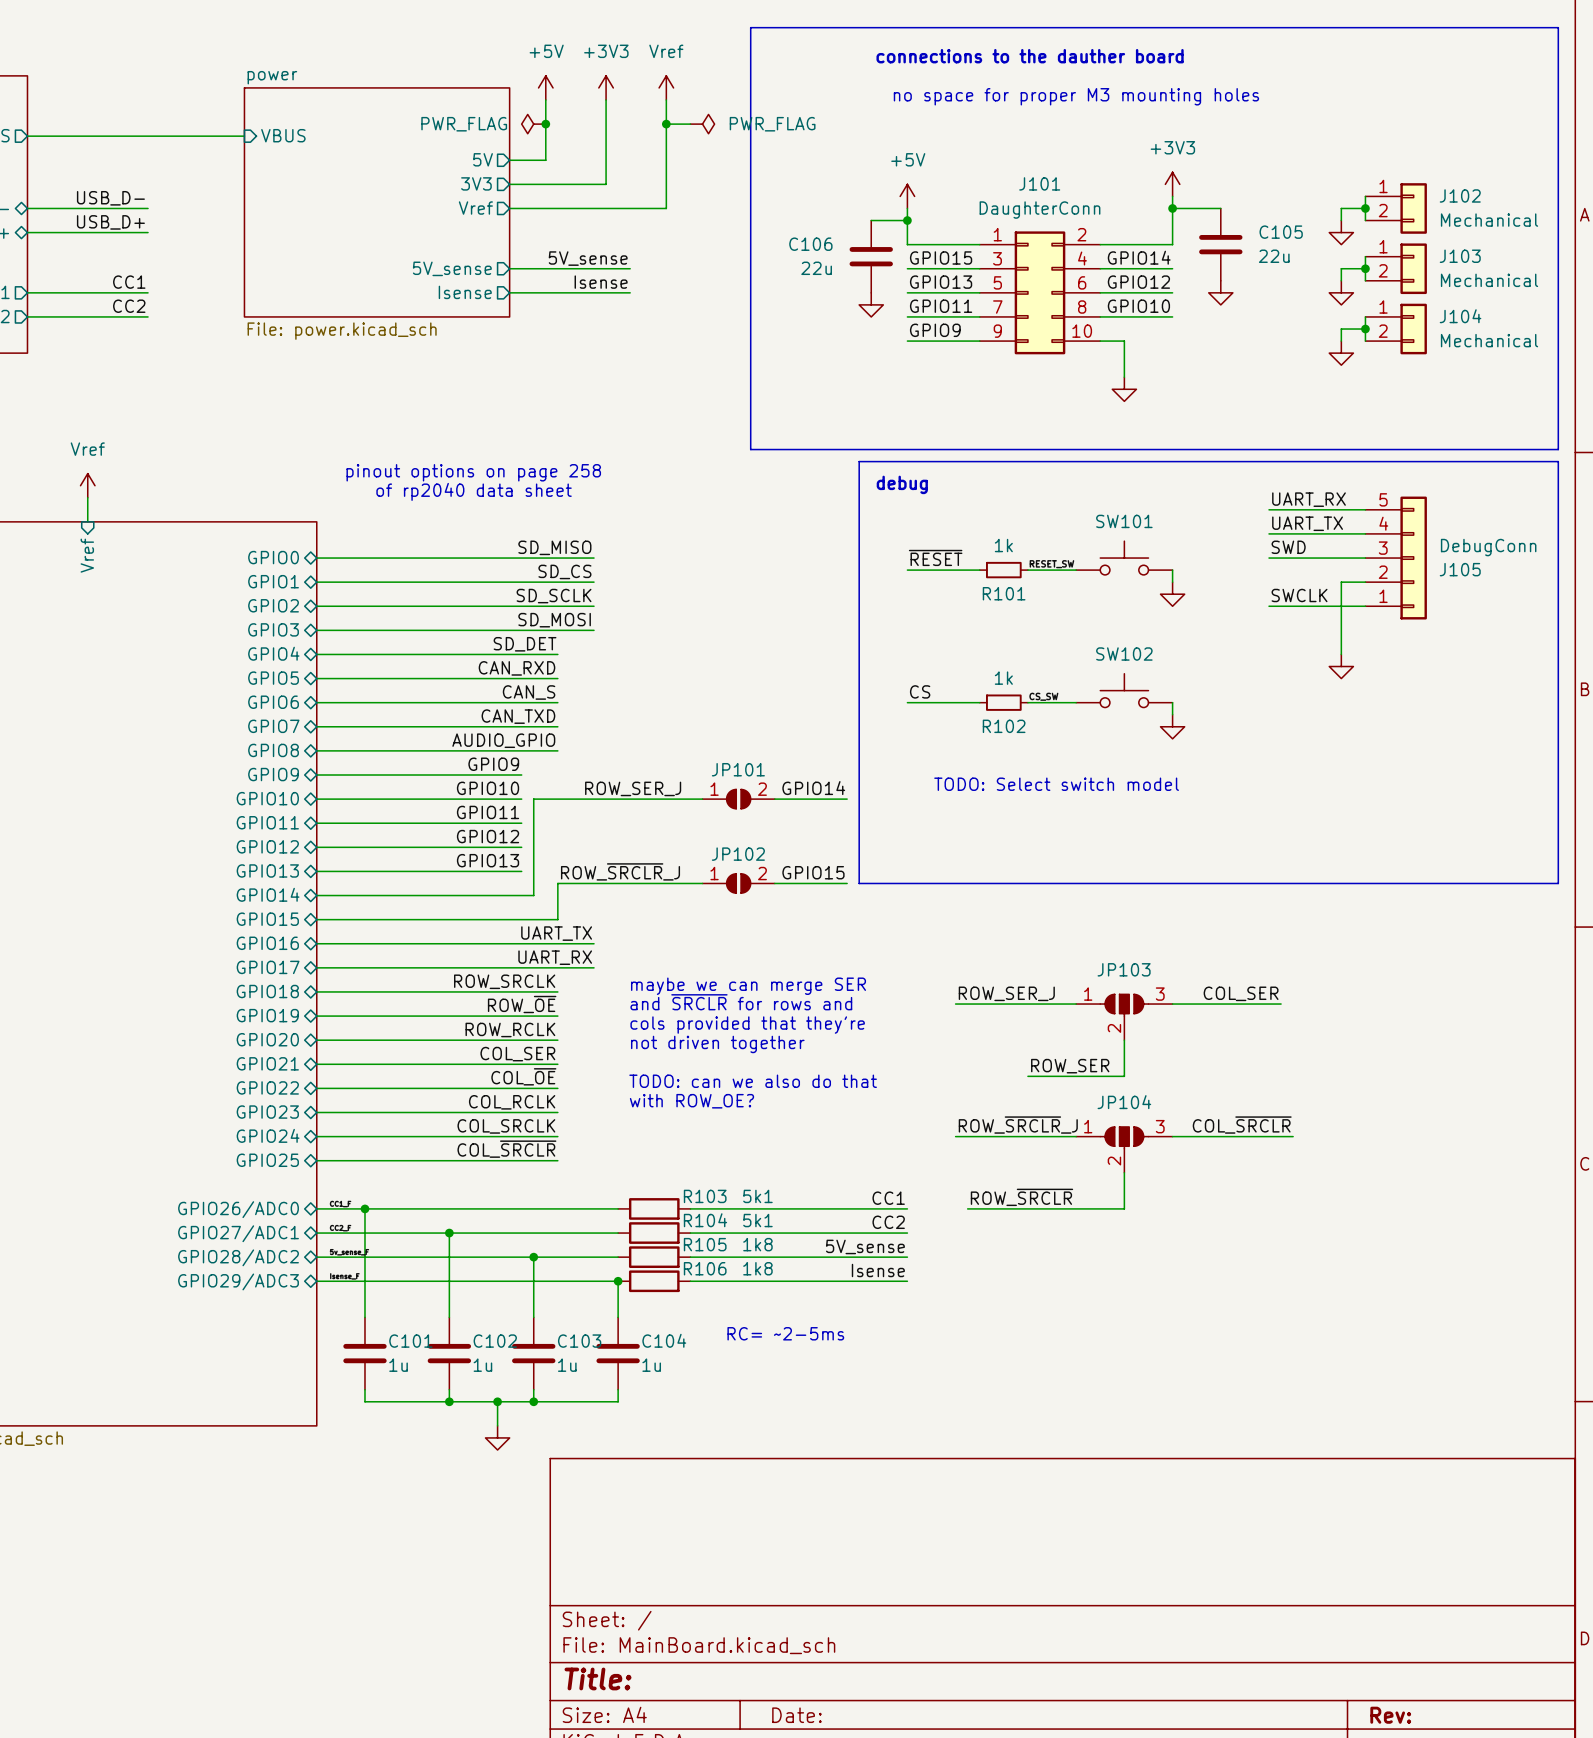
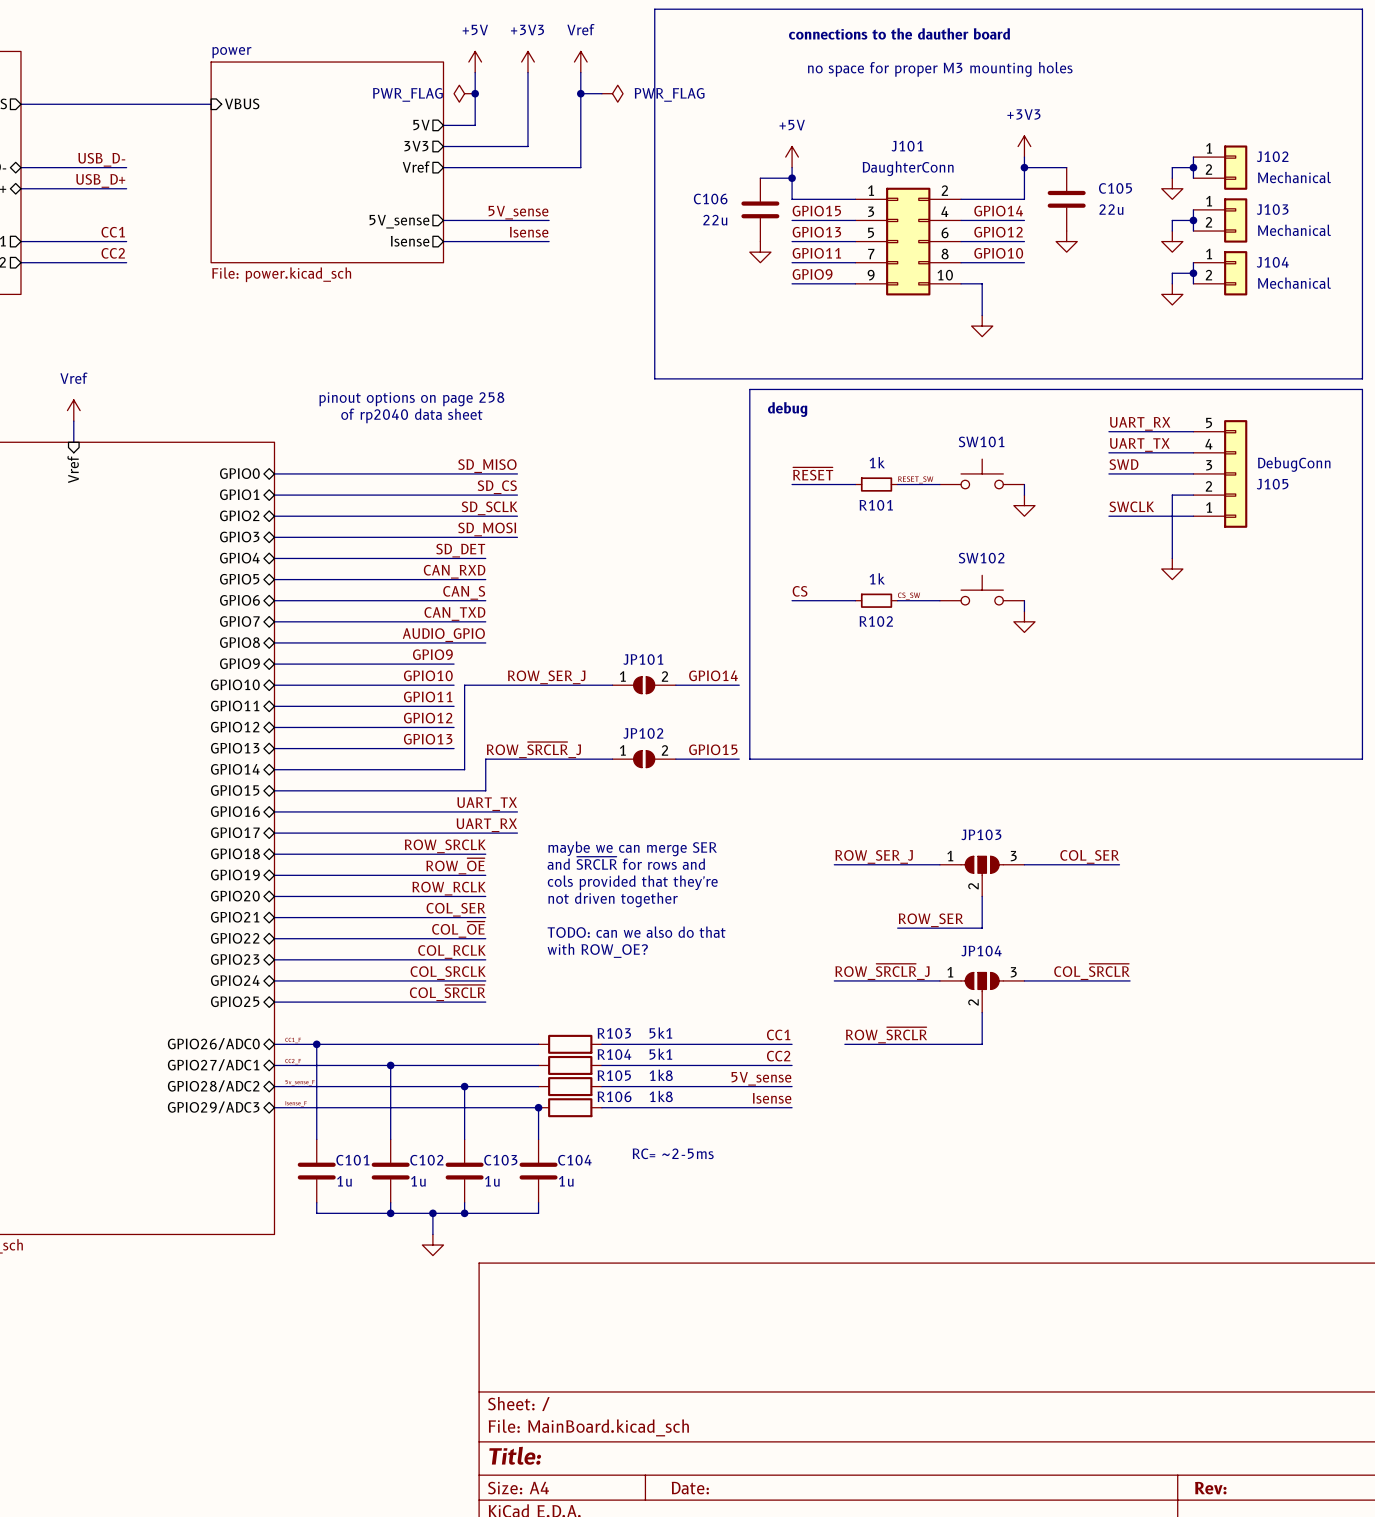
text: TODO: Select switch model (1056, 784) -> none

